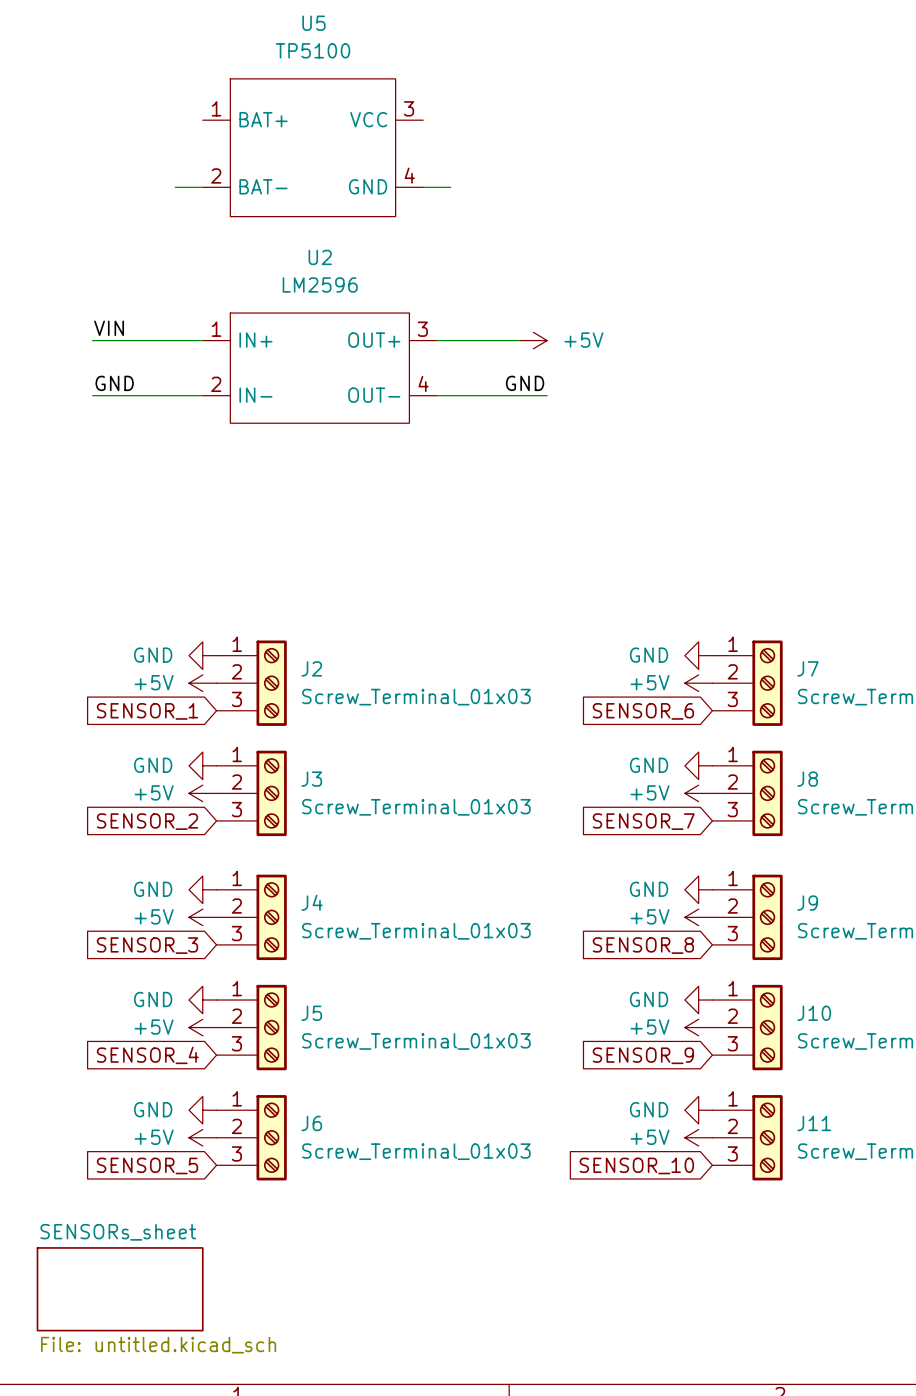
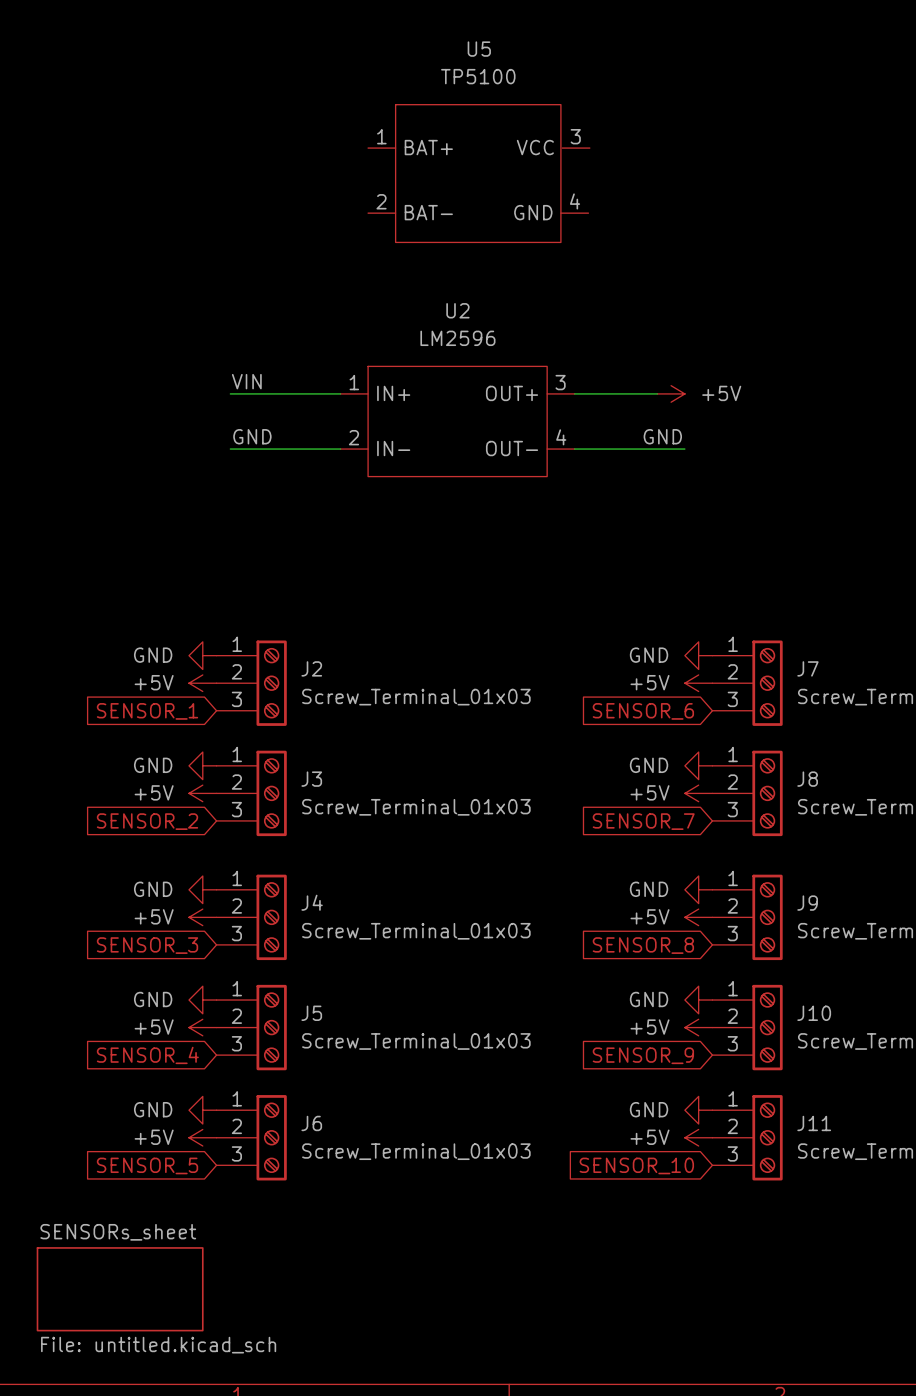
U5 symbol: [202, 78, 424, 217] -> [368, 104, 590, 243]
wire: (175, 187) (202, 187) -> none
wire: (423, 187) (450, 187) -> none
label position: VIN (109, 328) -> VIN (246, 381)
wire: (92, 340) (202, 340) -> (230, 449) (340, 449)
wire: (436, 340) (519, 340) -> (574, 393) (657, 393)
power symbol position: +5V (533, 340) -> +5V (671, 393)
U2 position: (319, 368) -> (457, 421)
label position: GND (114, 383) -> GND (252, 436)
label position: GND (525, 383) -> GND (662, 436)
wire: (92, 395) (202, 395) -> (230, 393) (340, 393)
wire: (436, 395) (547, 395) -> (574, 449) (684, 449)

